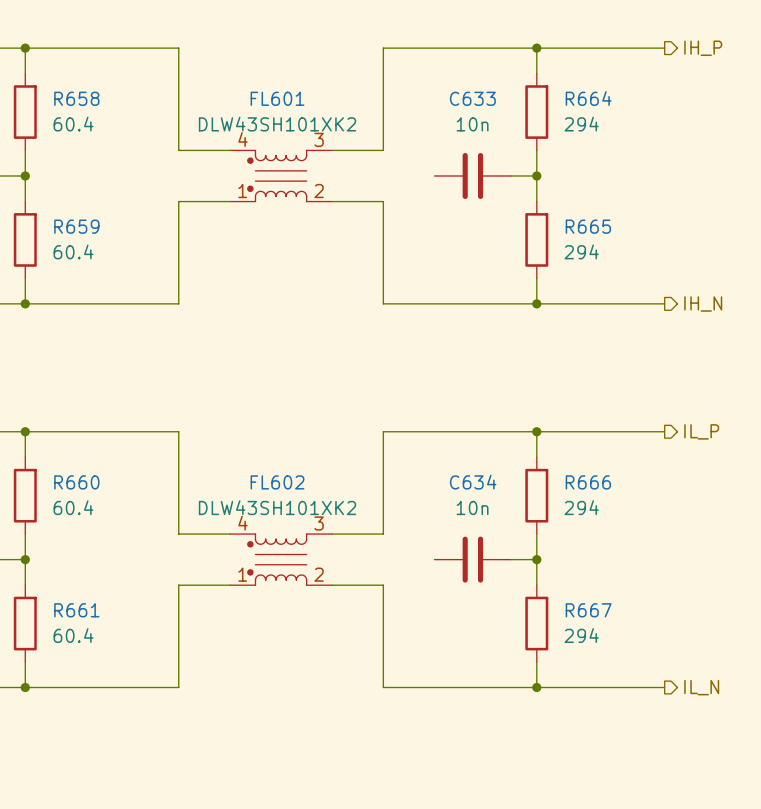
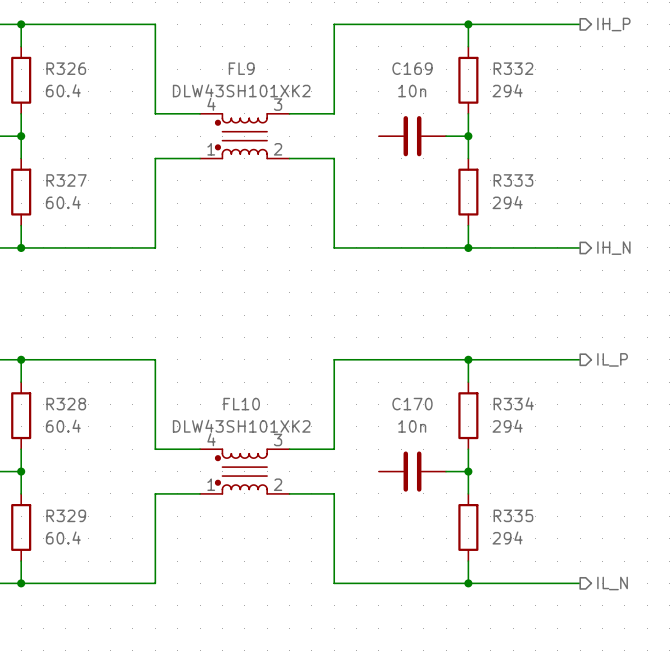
R658 name: R658 (76, 98) -> R326 (66, 68)
FL601 name: FL601 (277, 98) -> FL9 (241, 68)
C633 name: C633 (472, 98) -> C169 (412, 68)
R664 name: R664 (588, 98) -> R332 (513, 68)
R659 name: R659 (76, 226) -> R327 (66, 180)
R665 name: R665 (588, 226) -> R333 (513, 180)
R660 name: R660 (76, 482) -> R328 (66, 404)
FL602 name: FL602 (277, 482) -> FL10 (241, 404)
C634 name: C634 (473, 482) -> C170 (412, 404)
R666 name: R666 (588, 482) -> R334 (513, 403)
R661 name: R661 (76, 610) -> R329 (66, 515)
R667 name: R667 (588, 610) -> R335 (513, 515)

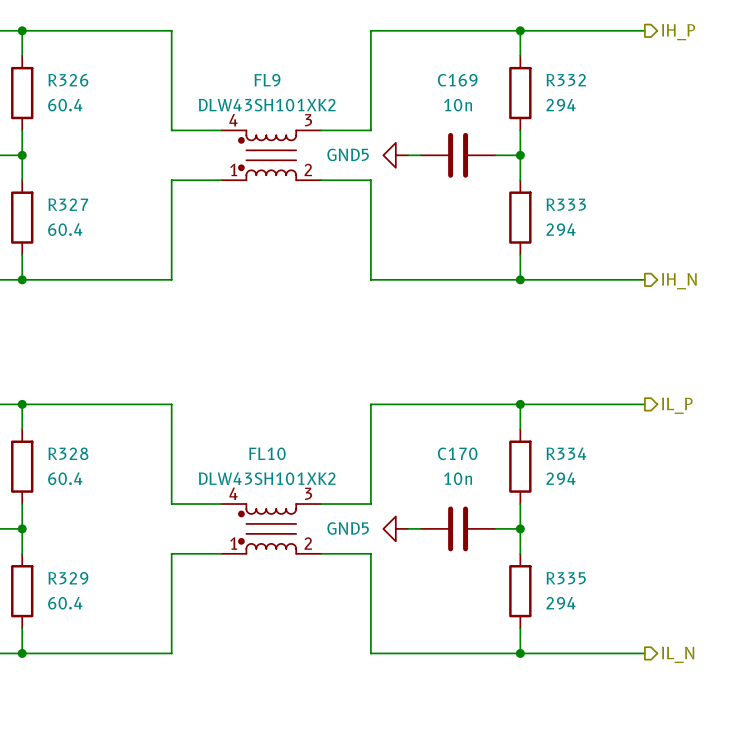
power symbol: none -> GND5 (395, 155)
wire: none -> (408, 155) (420, 155)
power symbol: none -> GND5 (395, 528)
wire: none -> (408, 528) (420, 528)

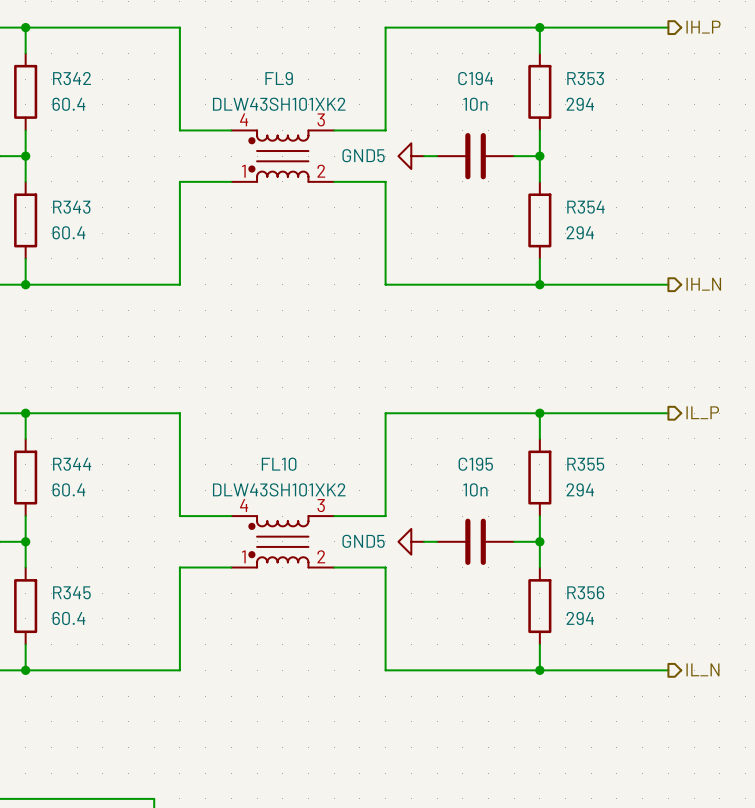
R326 name: R326 (68, 80) -> R342 (72, 78)
C169 name: C169 (457, 80) -> C194 (475, 78)
R332 name: R332 (566, 80) -> R353 (585, 78)
R327 name: R327 (68, 204) -> R343 (71, 207)
R333 name: R333 (566, 204) -> R354 (585, 207)
R328 name: R328 (68, 453) -> R344 (72, 464)
C170 name: C170 (457, 453) -> C195 (475, 464)
R334 name: R334 (566, 453) -> R355 (585, 464)
R329 name: R329 (68, 578) -> R345 (71, 592)
R335 name: R335 (566, 578) -> R356 (585, 592)

